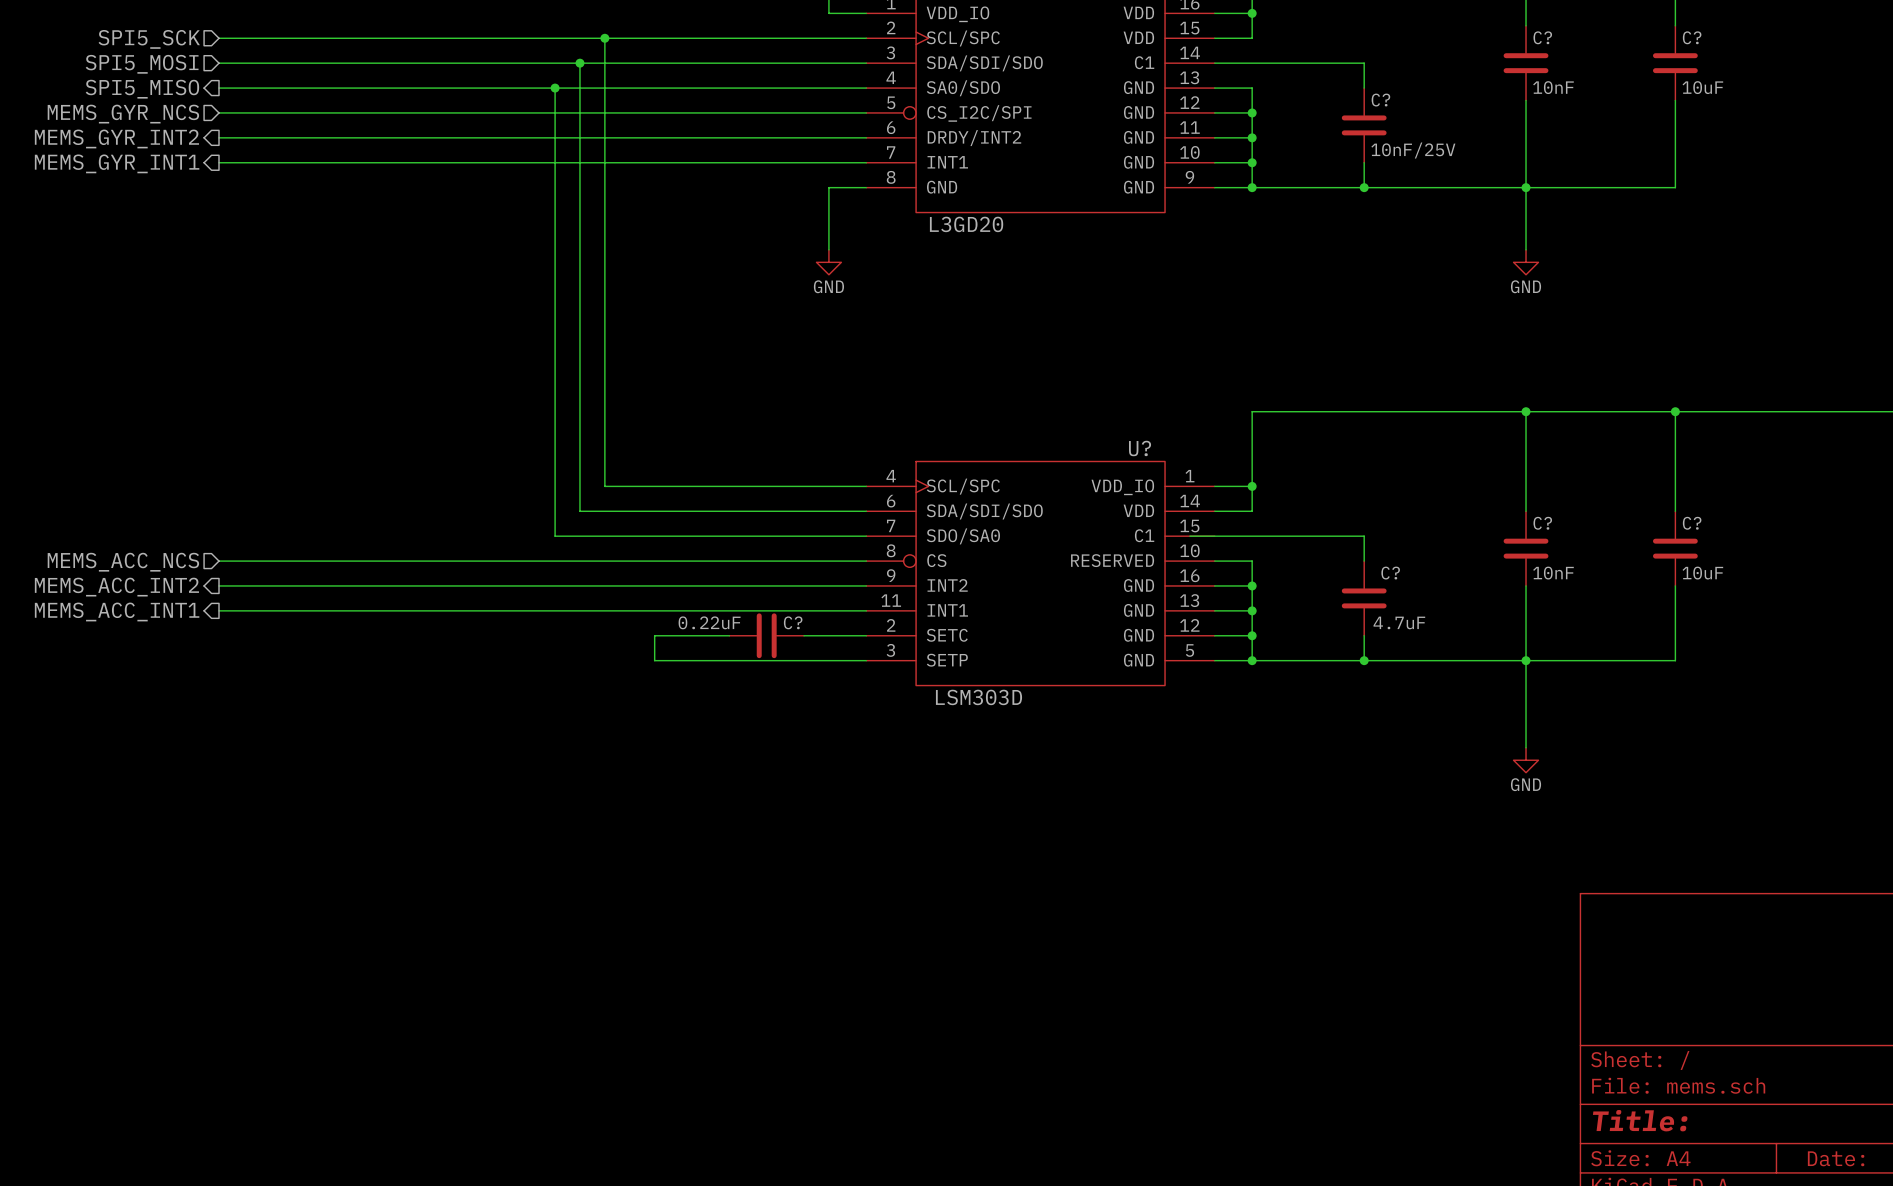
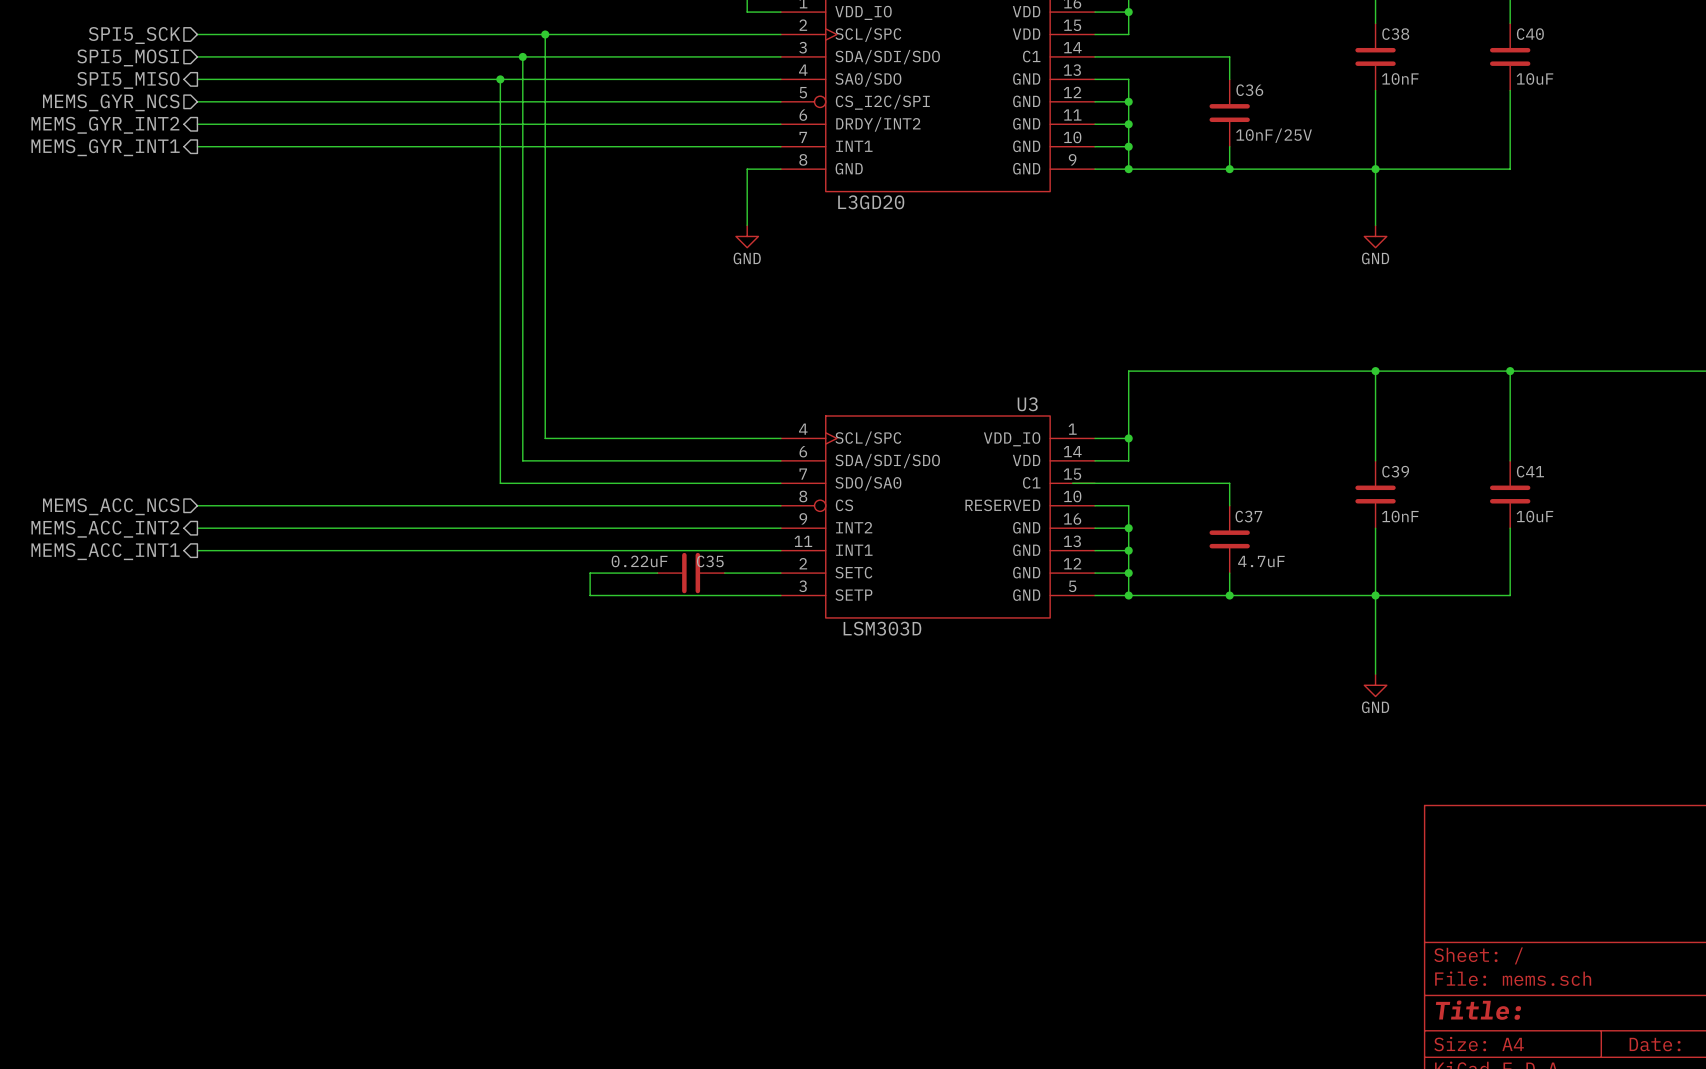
C? name: C? (1542, 37) -> C38 (1395, 34)
C? name: C? (1692, 37) -> C40 (1530, 34)
C? name: C? (1380, 100) -> C36 (1249, 90)
U? name: U? (1140, 448) -> U3 (1027, 404)
C? name: C? (1542, 523) -> C39 (1395, 471)
C? name: C? (1692, 523) -> C41 (1530, 471)
C? name: C? (1390, 573) -> C37 (1248, 516)
C? name: C? (793, 622) -> C35 (710, 561)

